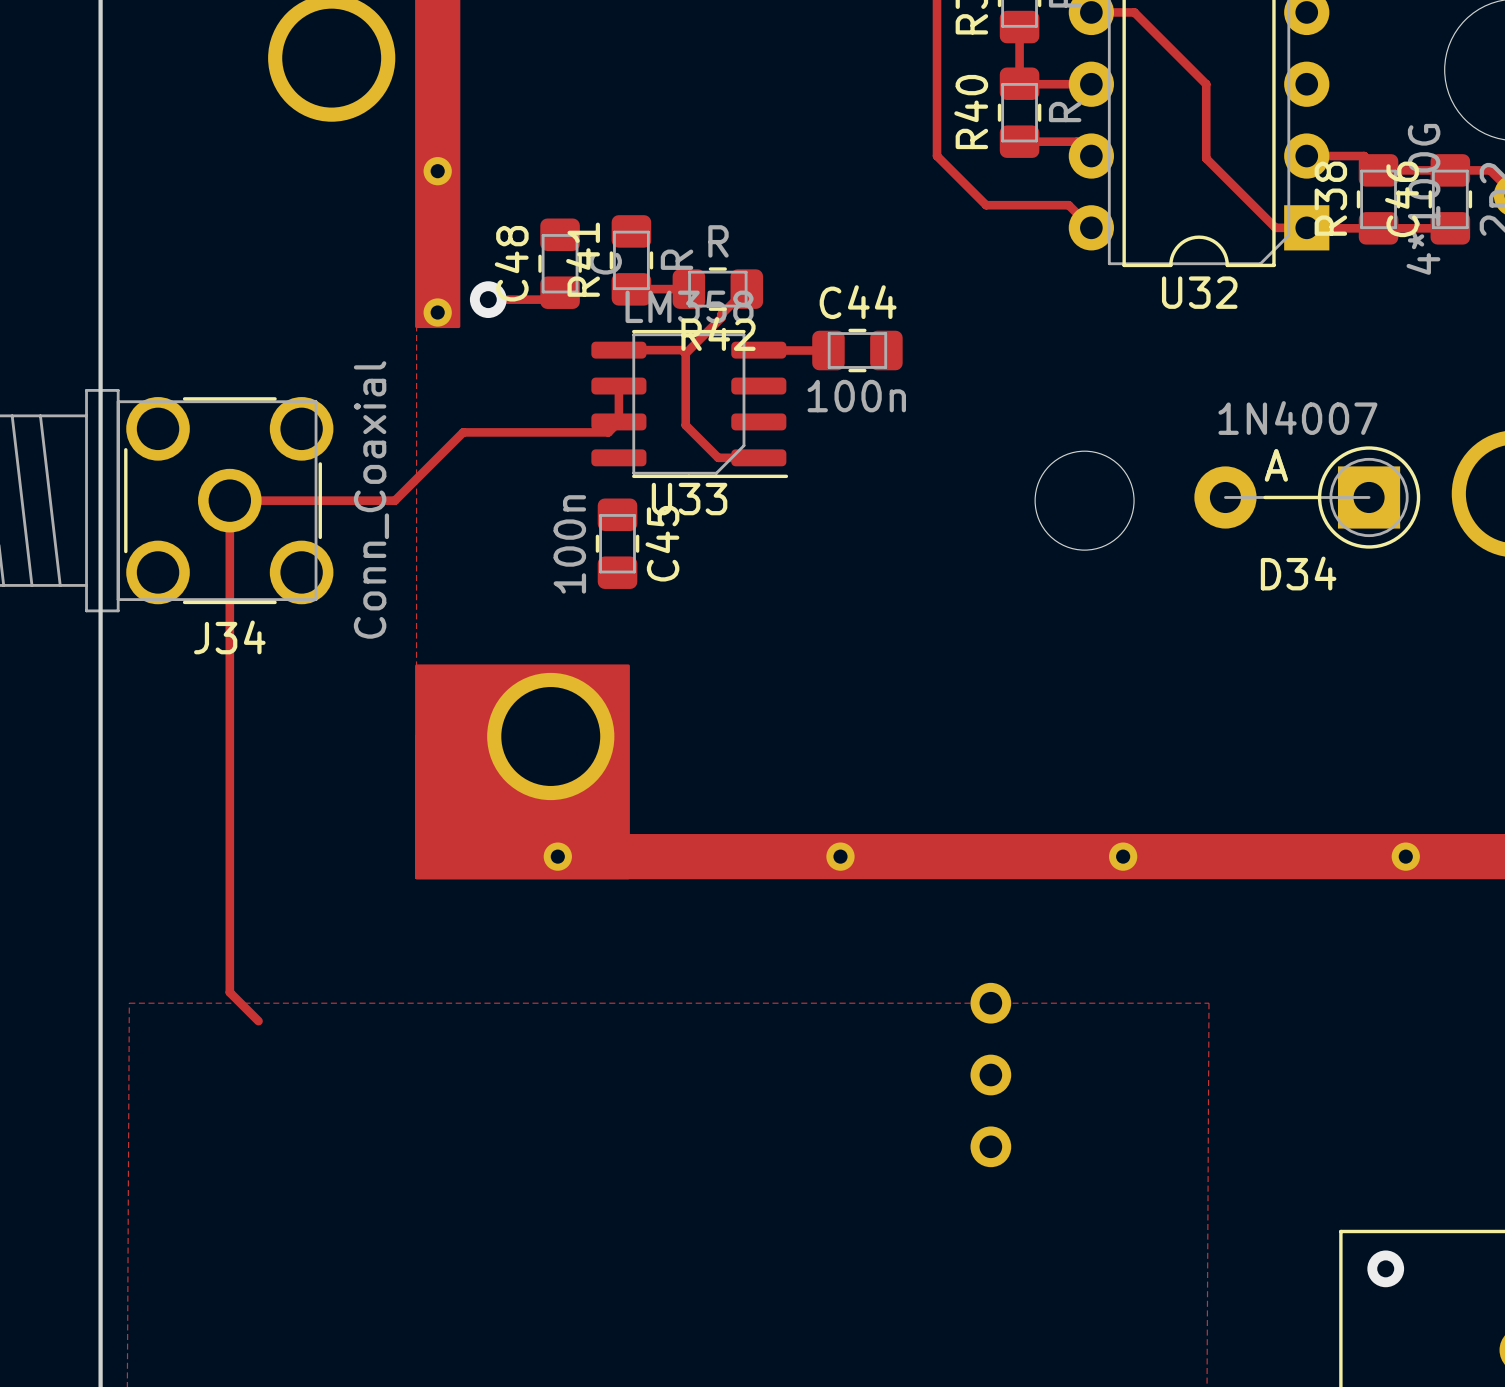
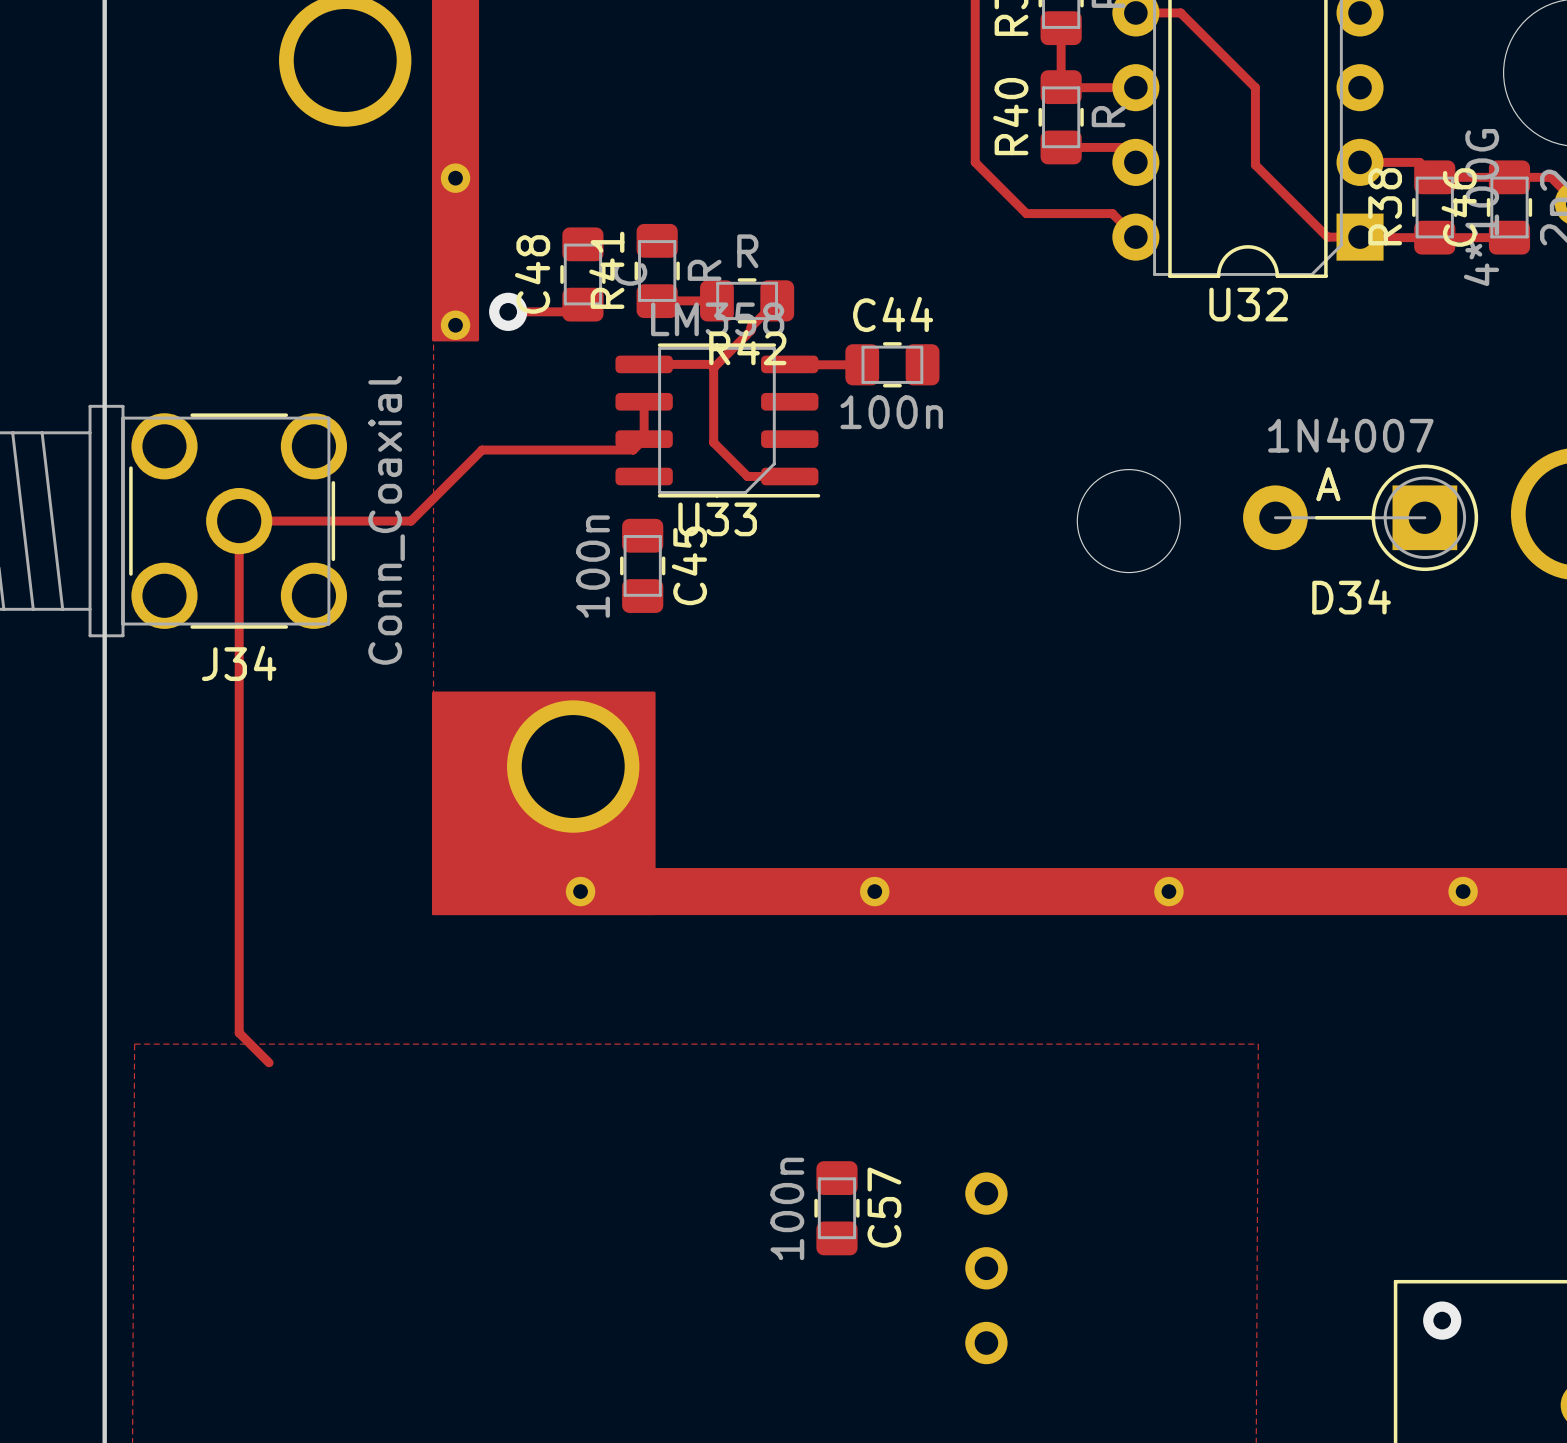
part position: (990, 1075) -> (986, 1268)
C57: none -> 100n (836, 1208)

